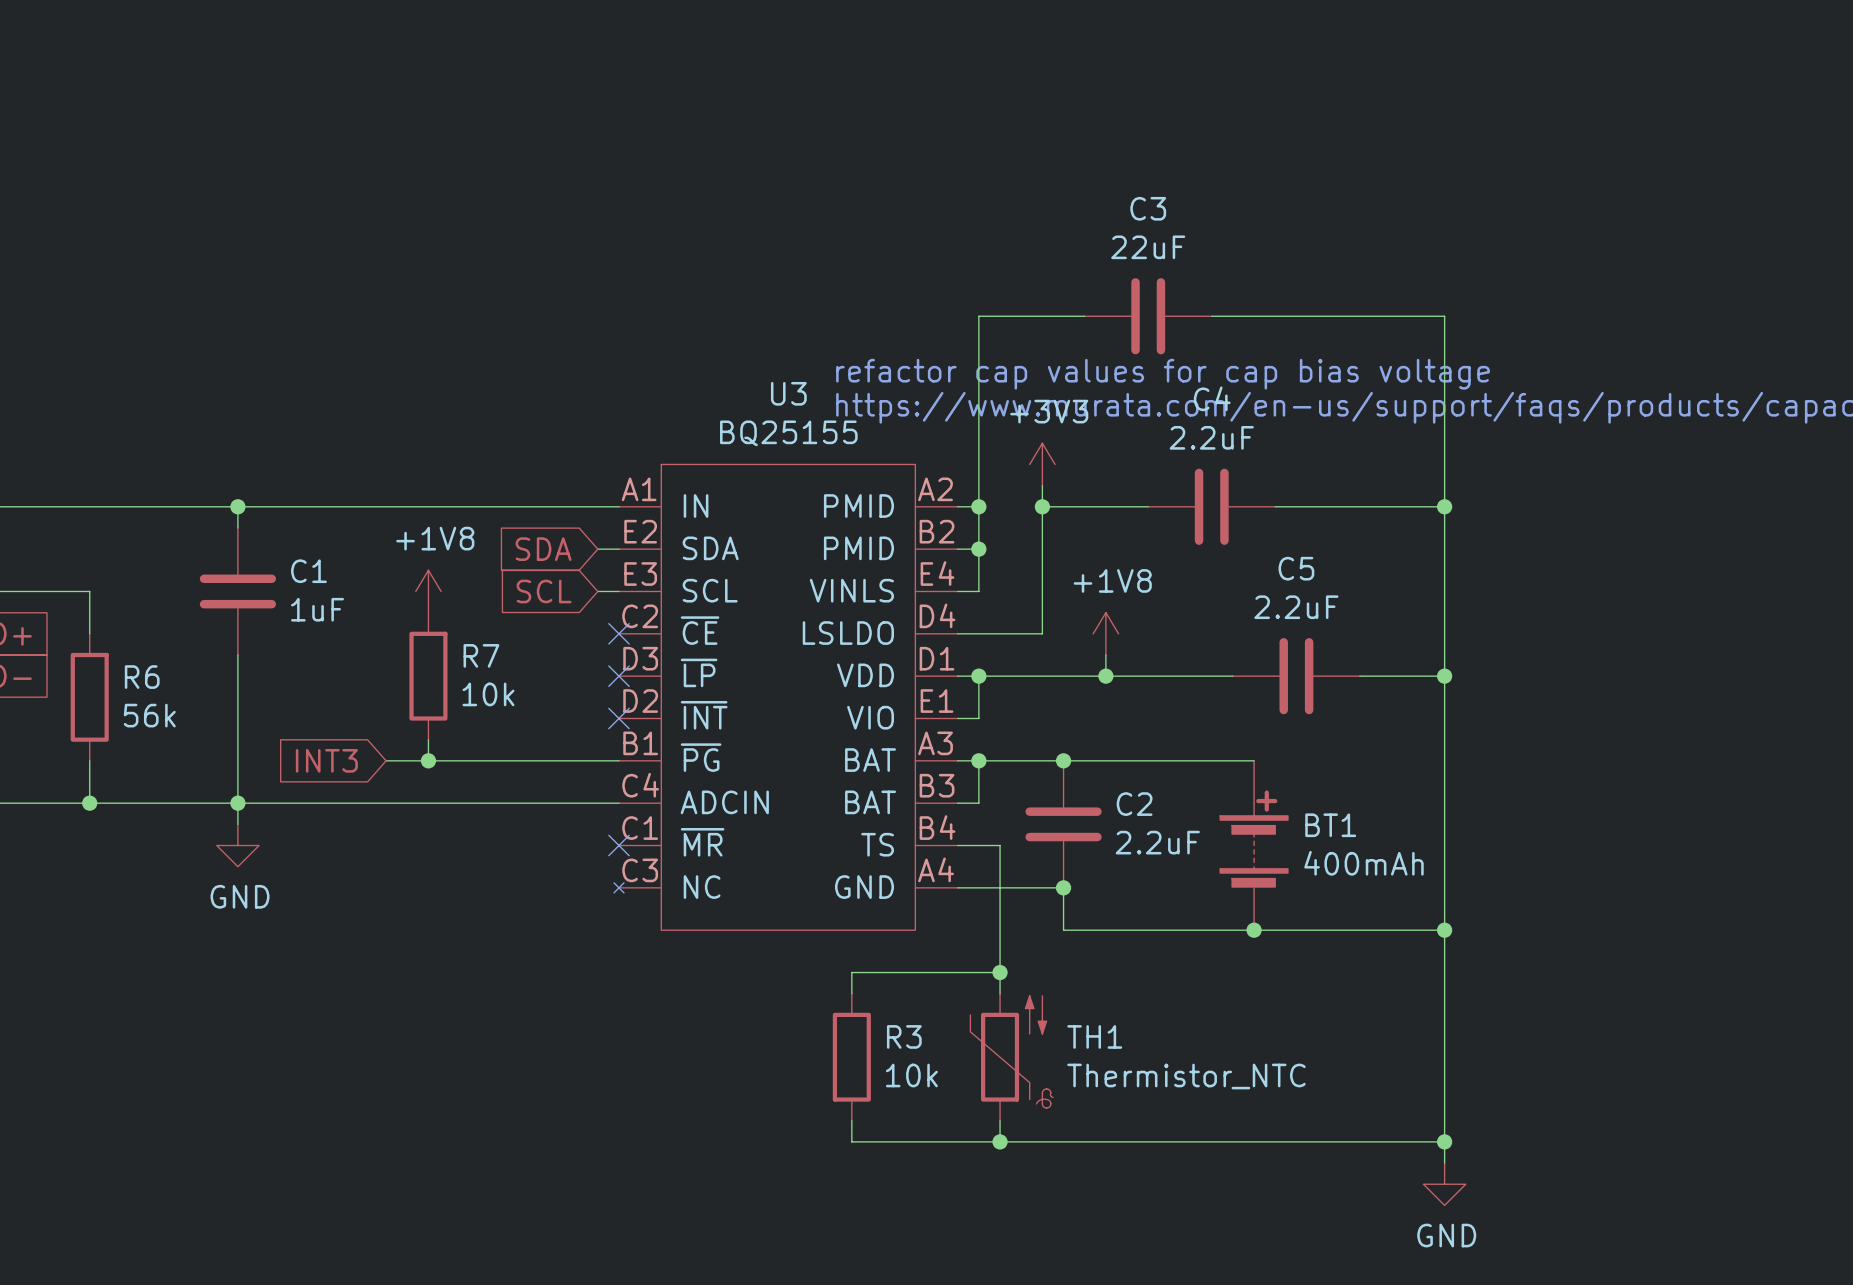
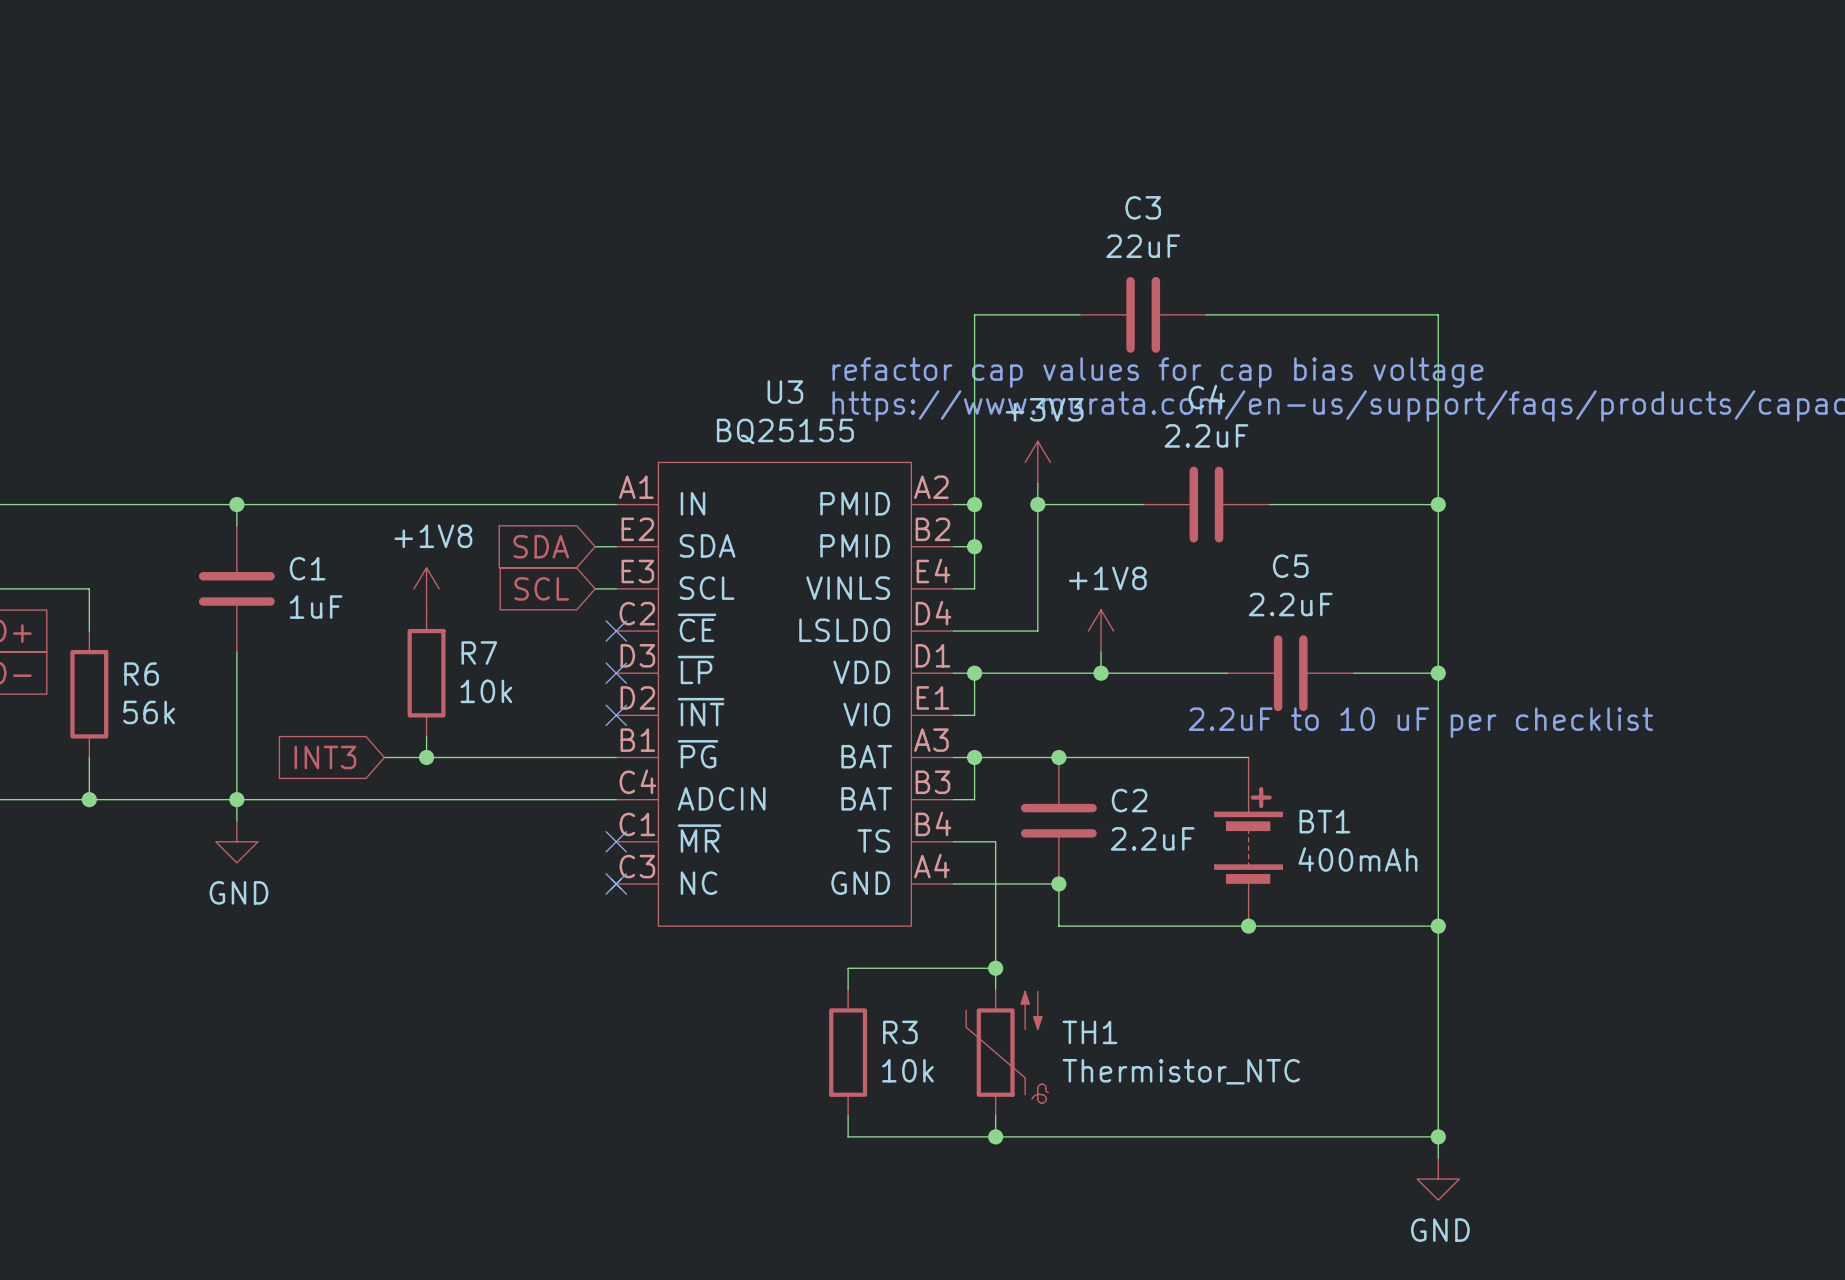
text: none -> 2.2uF to 10 uF per checklist (1420, 722)
no-connect mark: none -> (616, 883)

